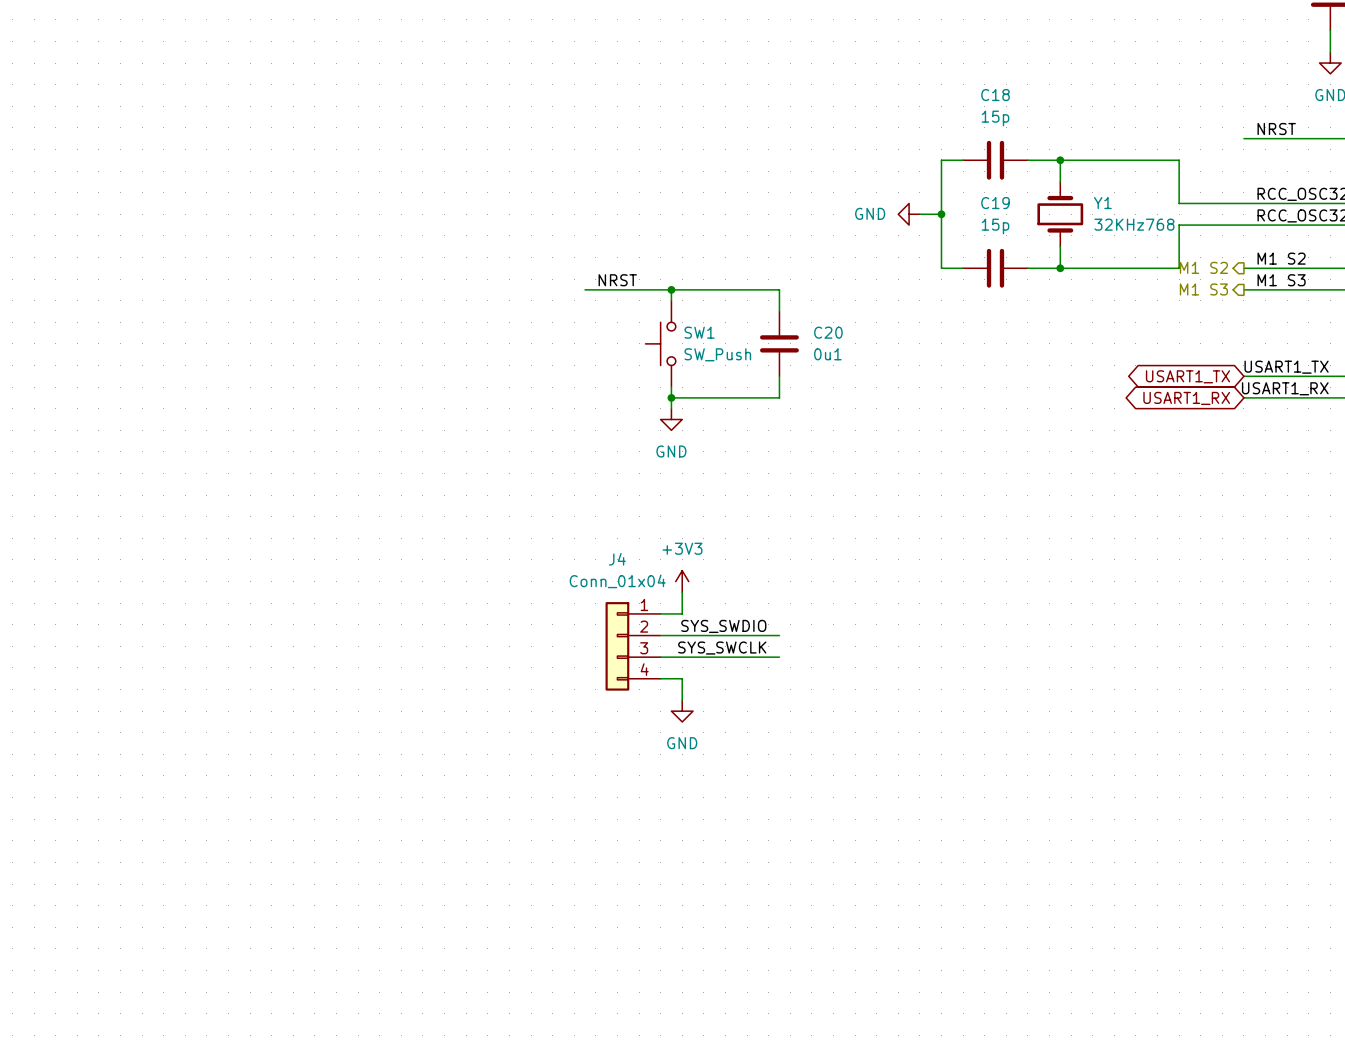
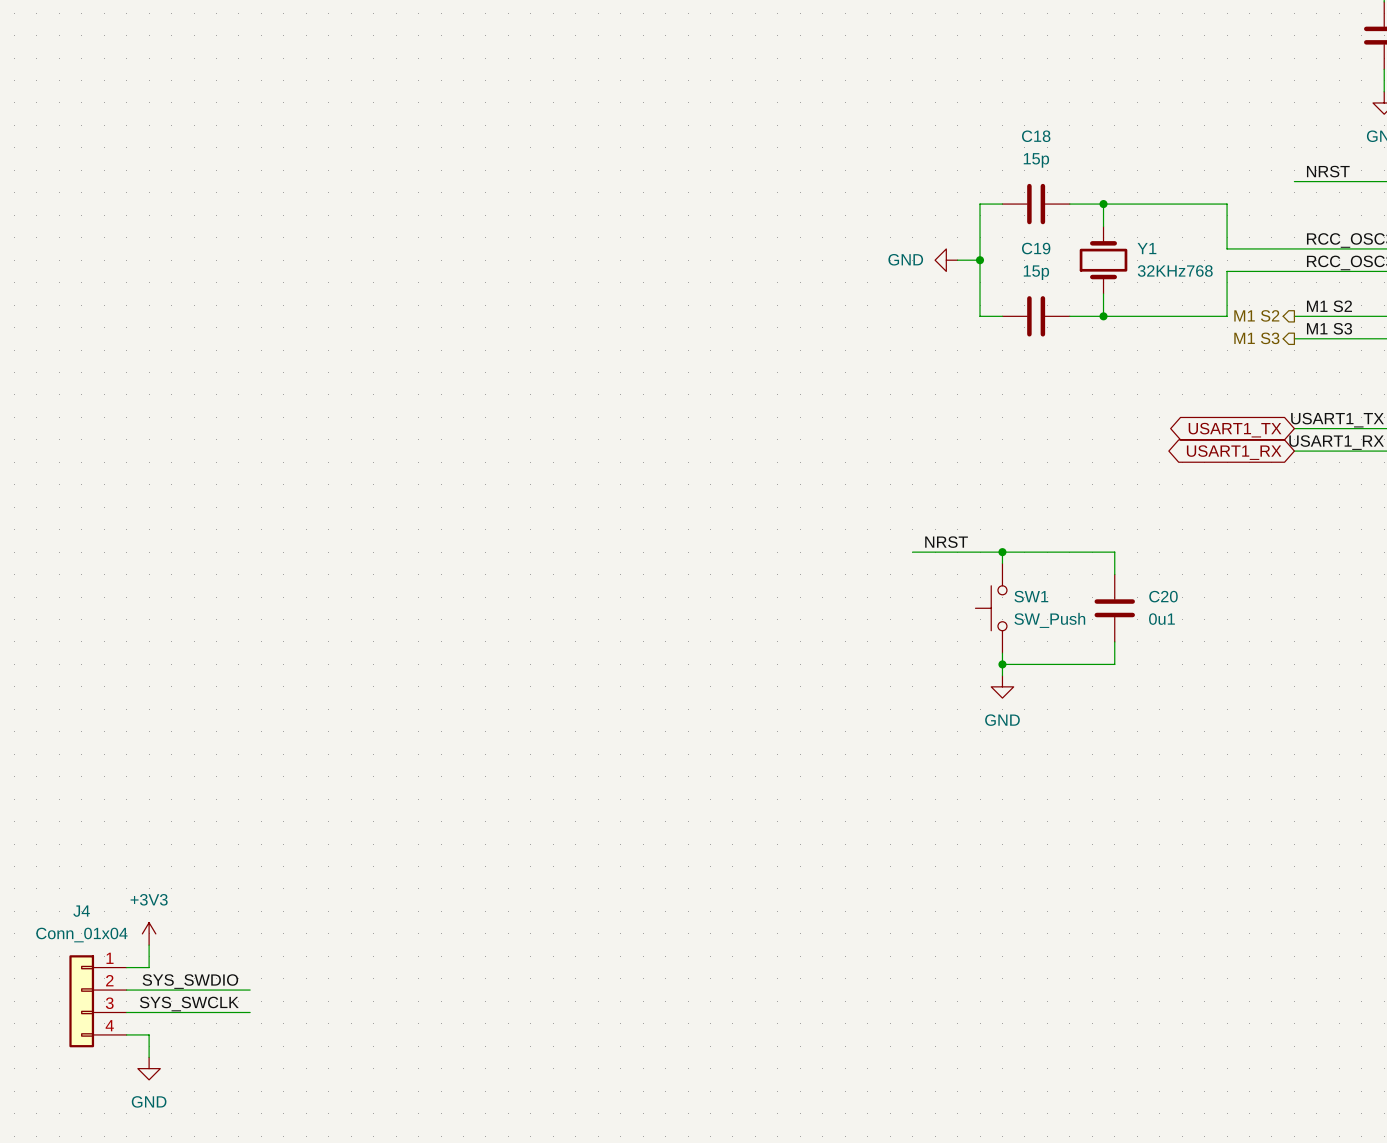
label: NRST (617, 280) -> none
wire: (585, 289) (779, 289) (779, 311) -> none
wire: (671, 289) (671, 300) -> none
junction: (671, 289) -> none
SW1 position: (660, 343) -> (991, 608)
C20 position: (779, 343) -> (1114, 608)
wire: (779, 376) (779, 397) (671, 397) -> none
wire: (671, 387) (671, 408) -> none
junction: (671, 397) -> none
power symbol: GND (671, 419) -> none
label: none -> NRST (946, 542)
wire: none -> (912, 552) (1114, 552) (1114, 574)
wire: none -> (1002, 552) (1002, 563)
junction: none -> (1002, 552)
power symbol: +3V3 (682, 581) -> none
wire: none -> (1114, 641) (1114, 664) (1002, 664)
wire: (682, 592) (682, 613) (660, 613) -> none
wire: none -> (1002, 653) (1002, 675)
junction: none -> (1002, 664)
power symbol: none -> GND (1002, 686)
label: SYS_SWDIO (723, 626) -> none
wire: (660, 635) (779, 635) -> none
J4 position: (633, 646) -> (98, 1001)
label: SYS_SWCLK (722, 648) -> none
wire: (660, 657) (779, 657) -> none
wire: (660, 678) (682, 678) (682, 700) -> none
power symbol: GND (682, 711) -> none
power symbol: none -> +3V3 (149, 933)
wire: none -> (149, 945) (149, 967) (126, 967)
label: none -> SYS_SWDIO (190, 981)
wire: none -> (126, 990) (250, 990)
label: none -> SYS_SWCLK (189, 1004)
wire: none -> (126, 1012) (250, 1012)
wire: none -> (126, 1034) (149, 1034) (149, 1057)
power symbol: none -> GND (149, 1068)

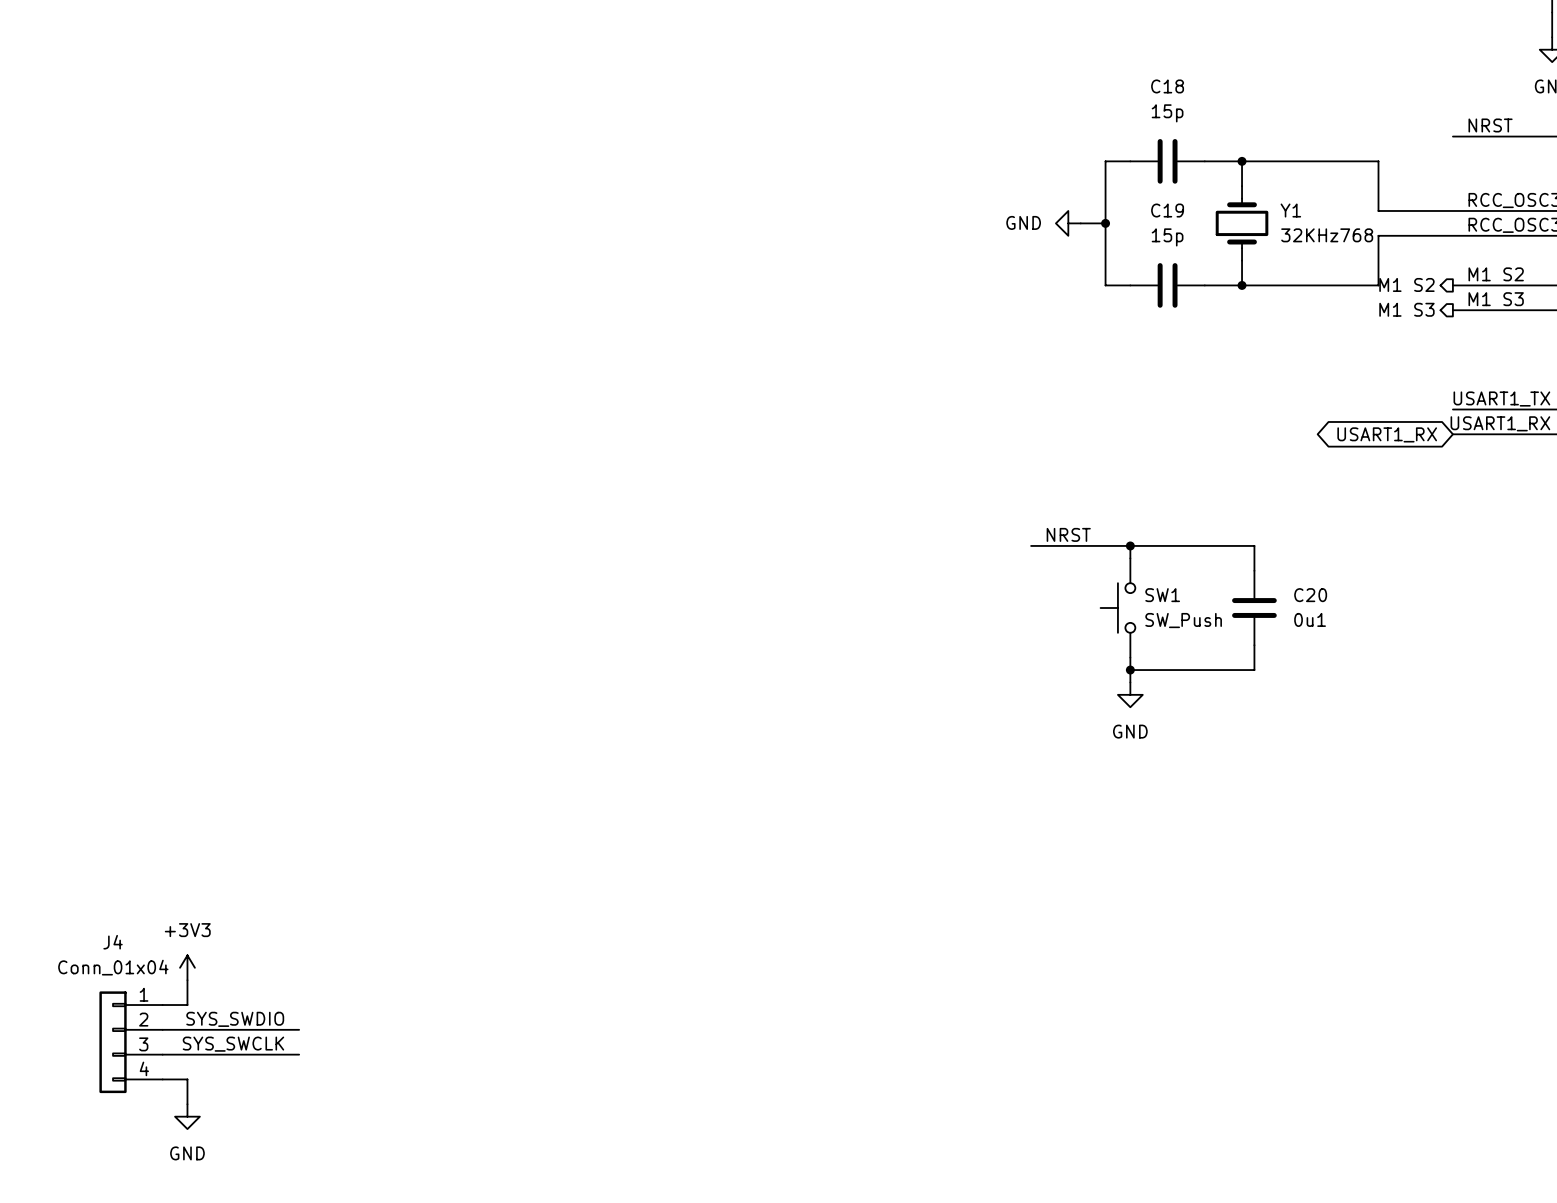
global label: USART1_TX (1235, 430) -> none

